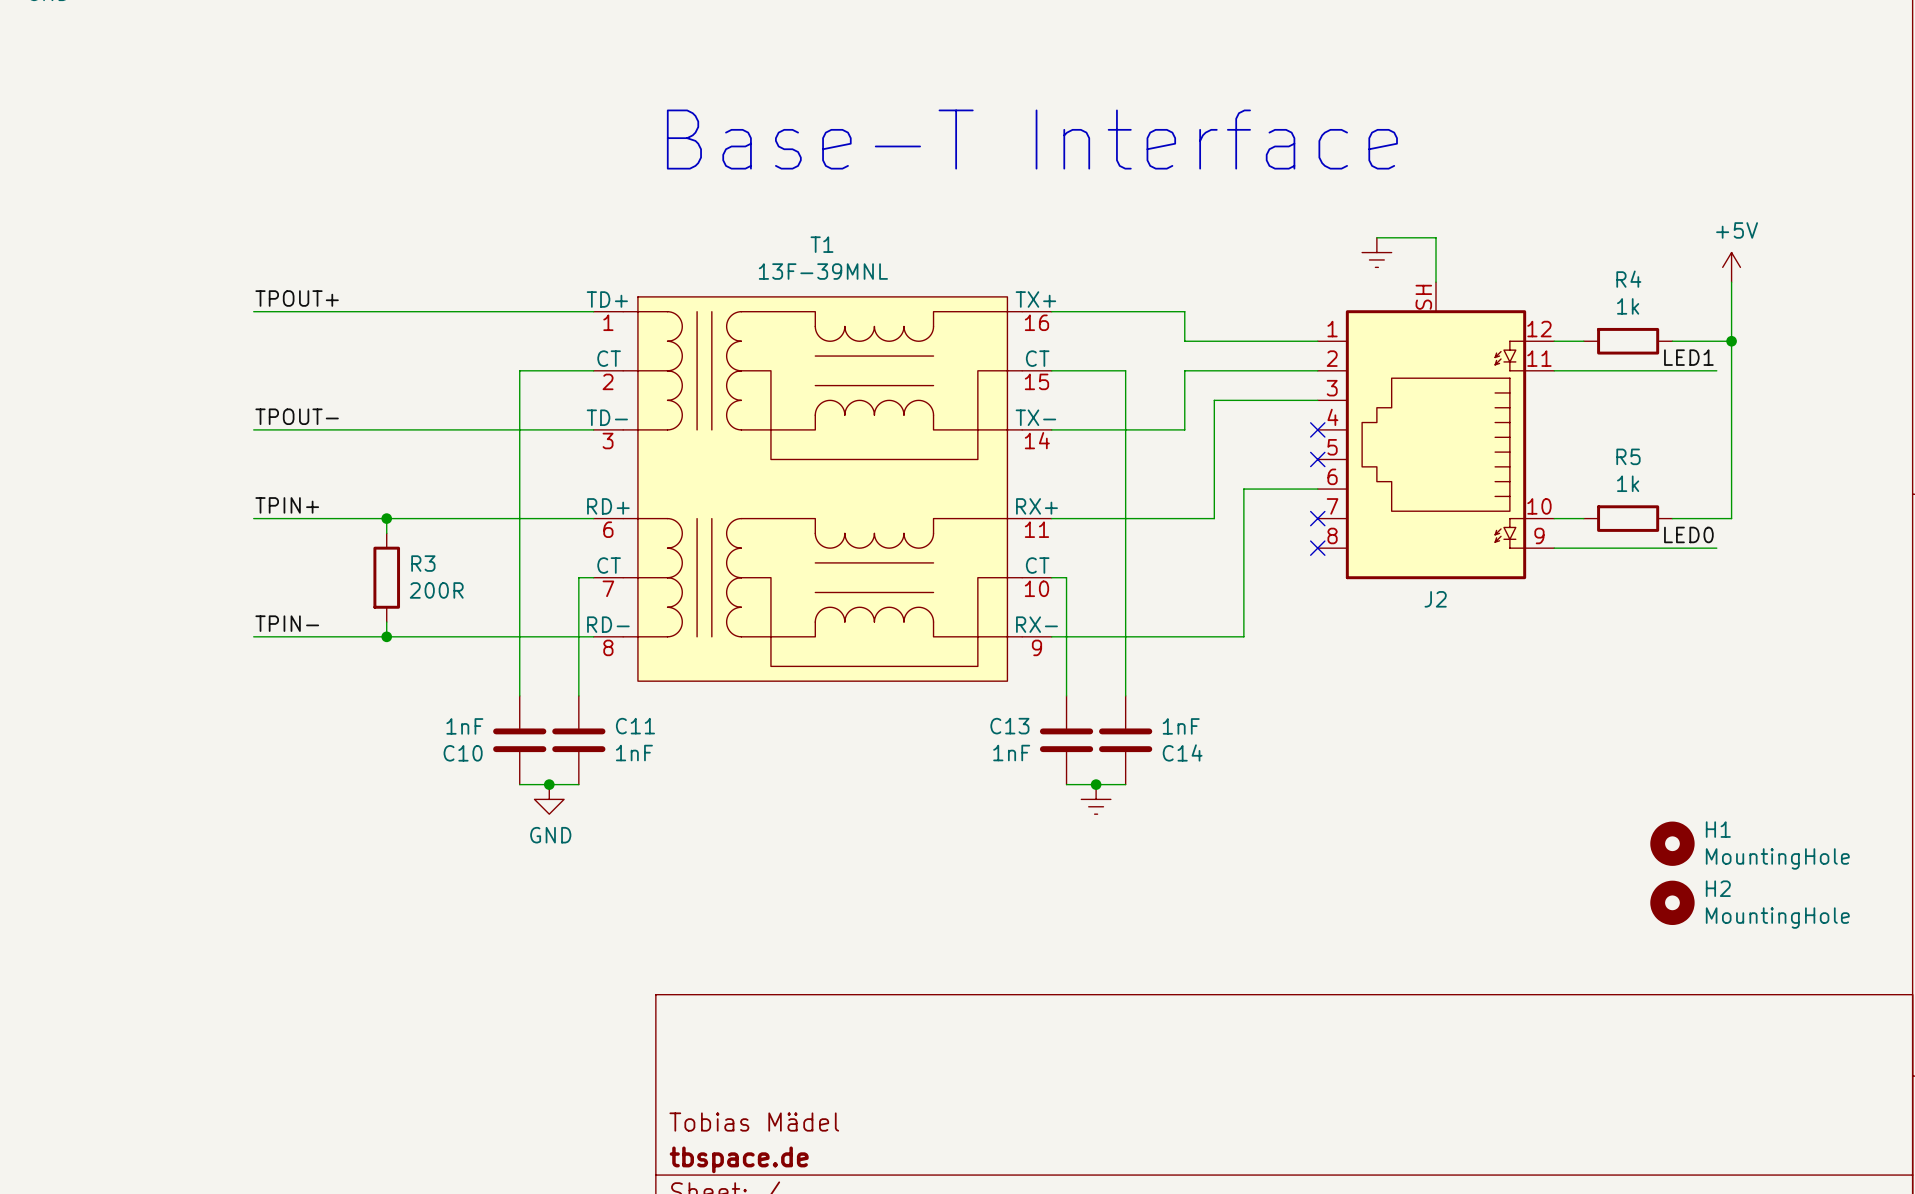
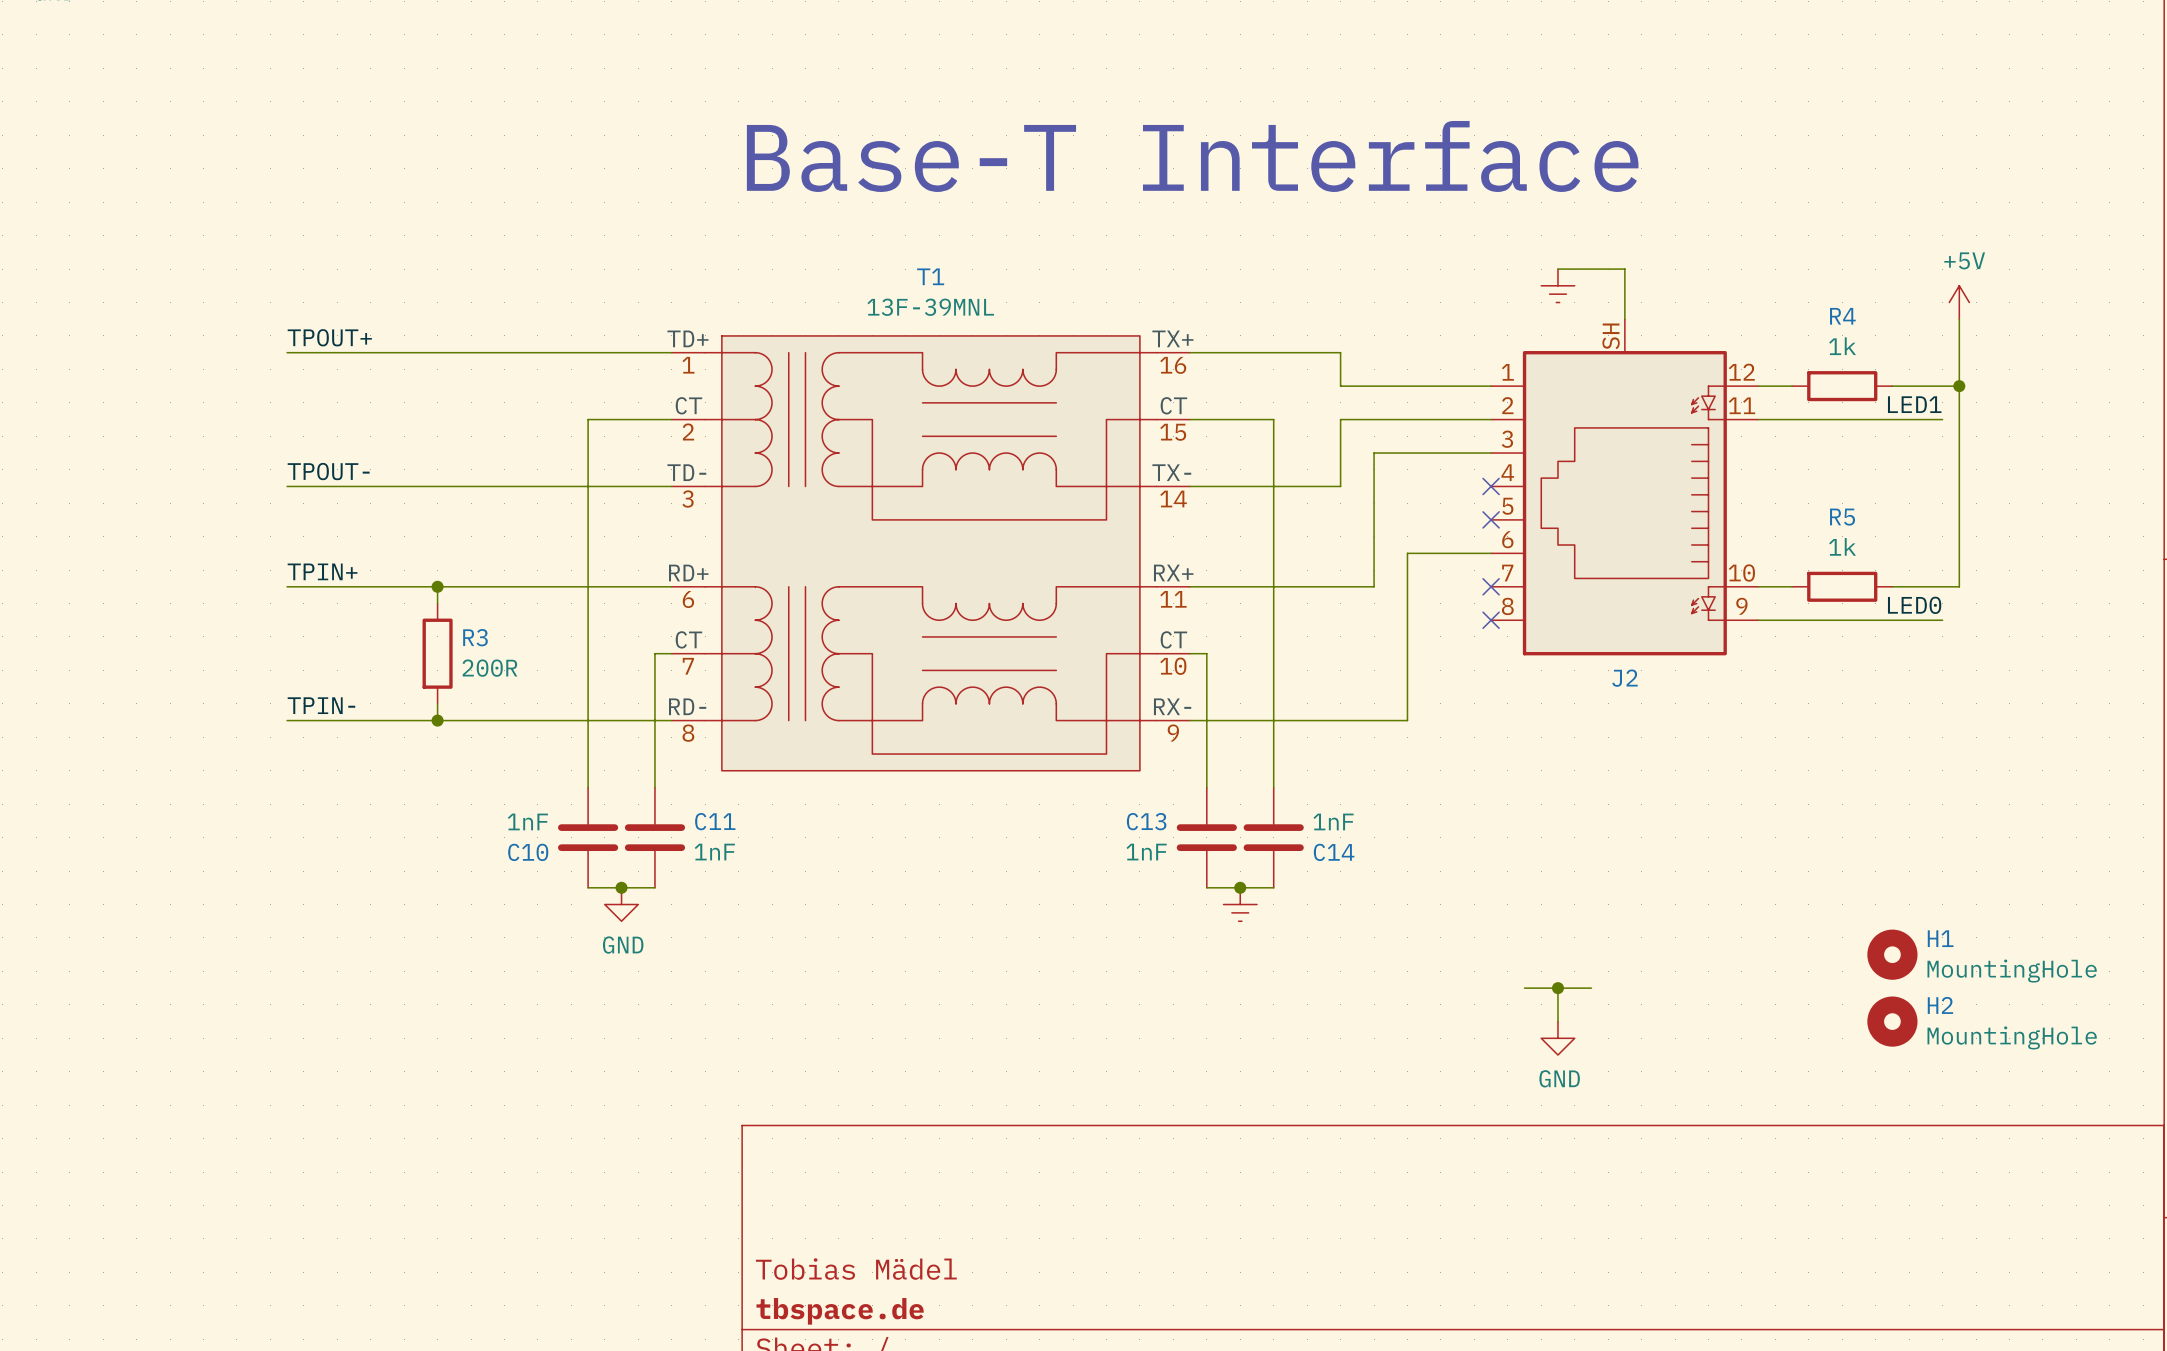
wire: none -> (1524, 988) (1591, 988)
wire: none -> (1557, 988) (1557, 1021)
junction: none -> (1557, 988)
power symbol: none -> GND (1557, 1038)

